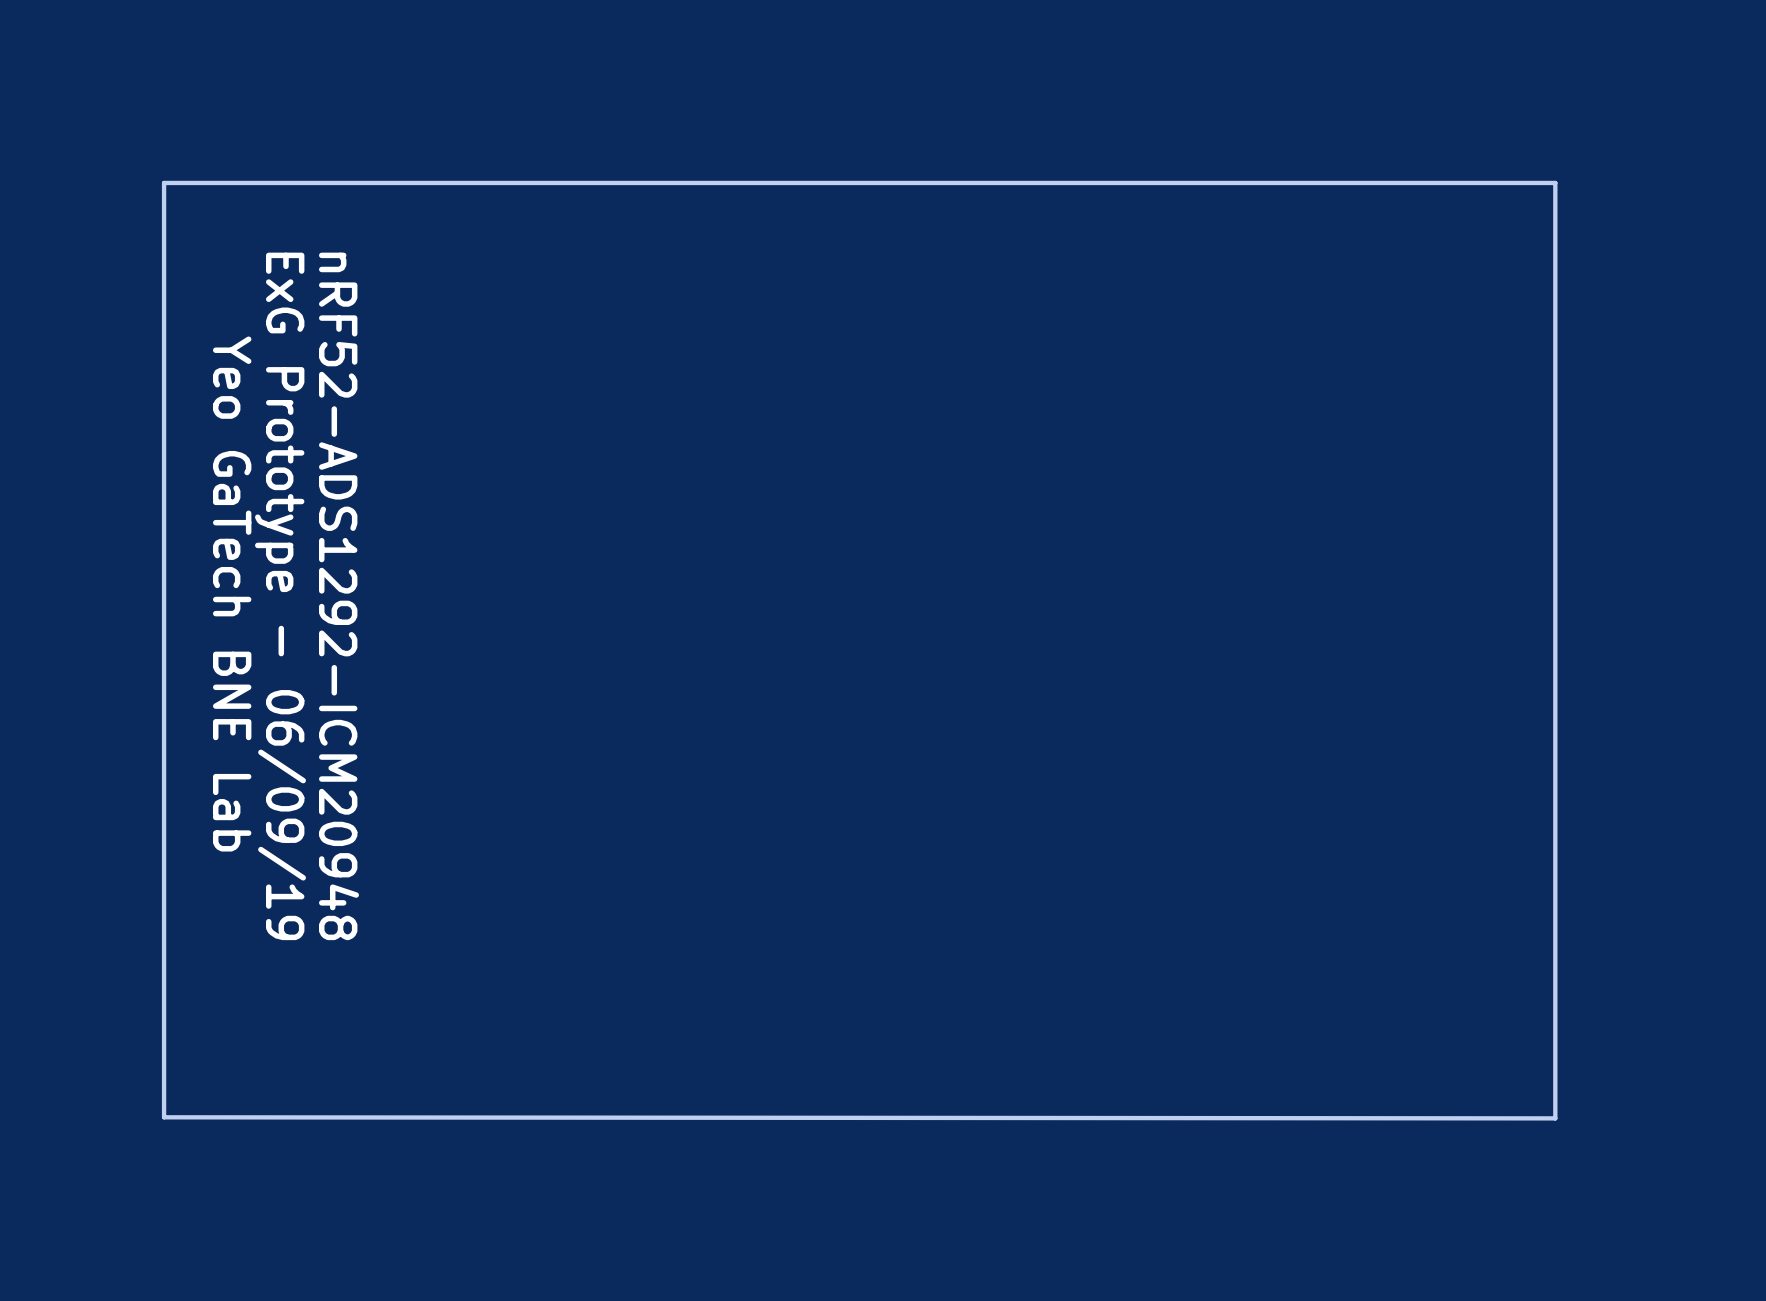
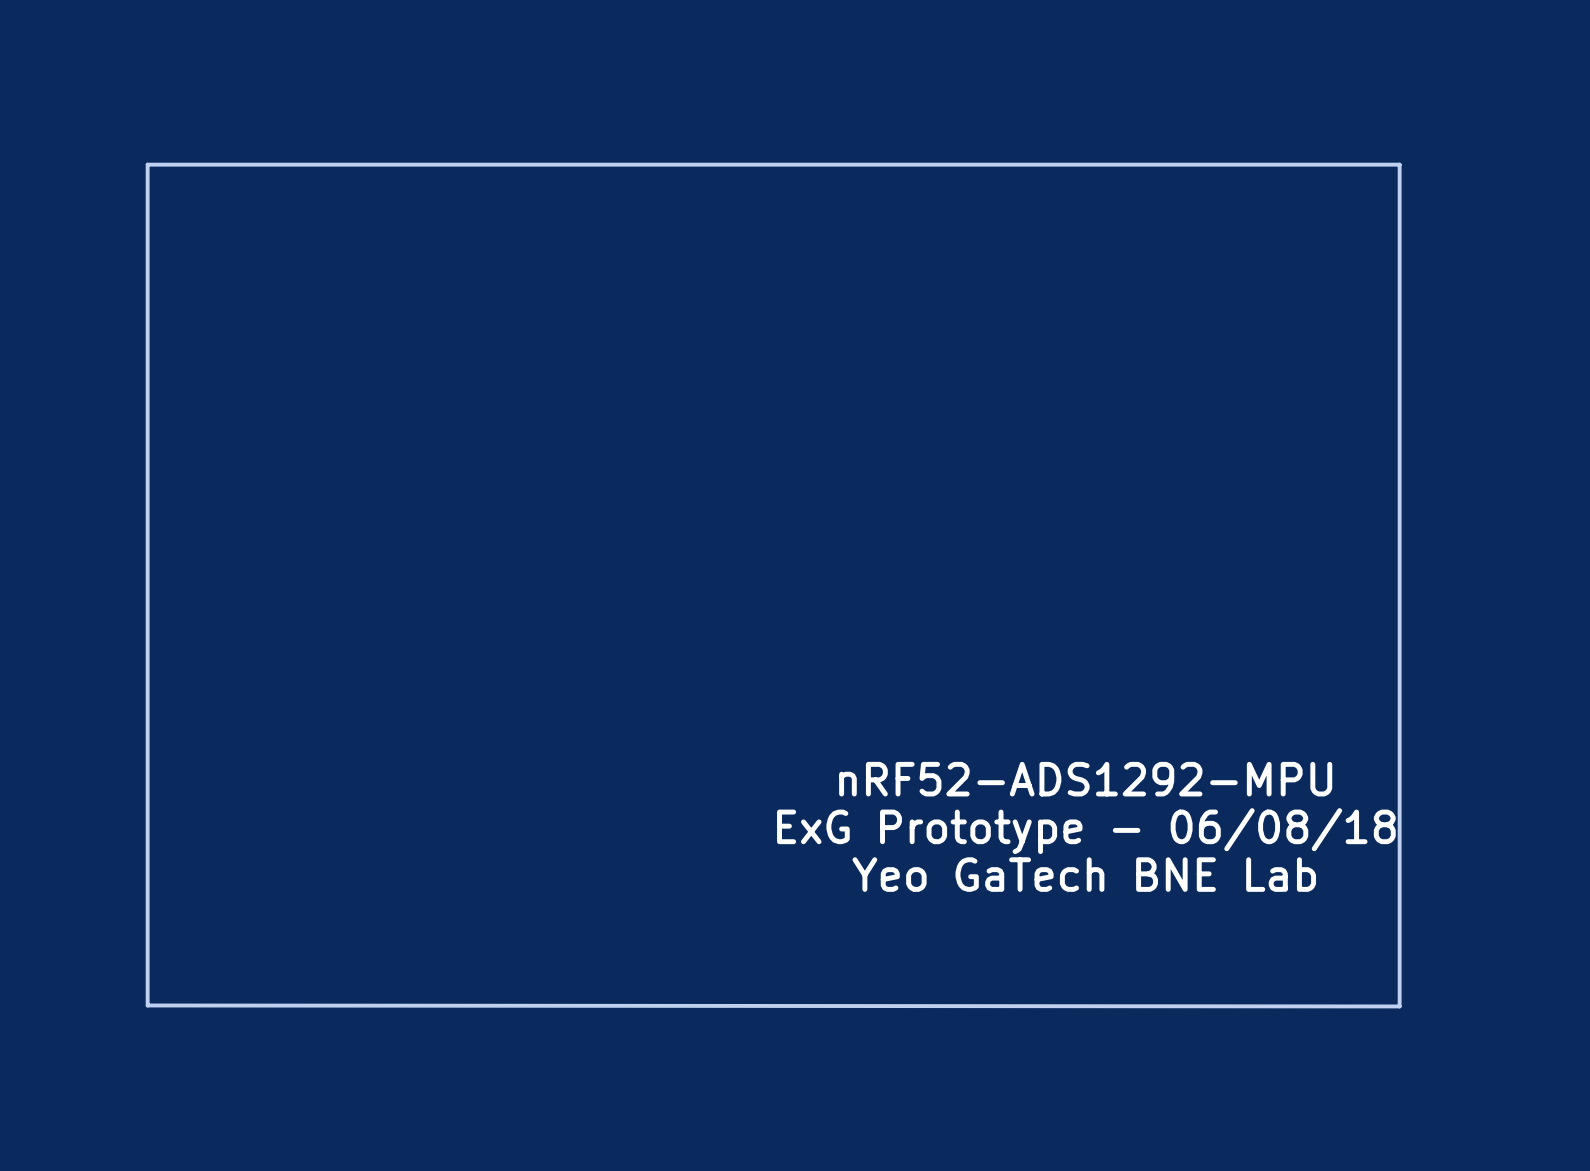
text rotation: 0° (232, 594) -> 90° counterclockwise (1084, 874)
text position: Yeo GaTech BNE Lab (232, 594) -> Yeo GaTech BNE Lab (1084, 874)
text: ExG Prototype - 06/09/19 (280, 596) -> none
text: nRF52-ADS1292-ICM20948 (338, 596) -> none
text: none -> nRF52-ADS1292-MPU (1085, 779)
text: none -> ExG Prototype - 06/08/18 (1086, 831)

